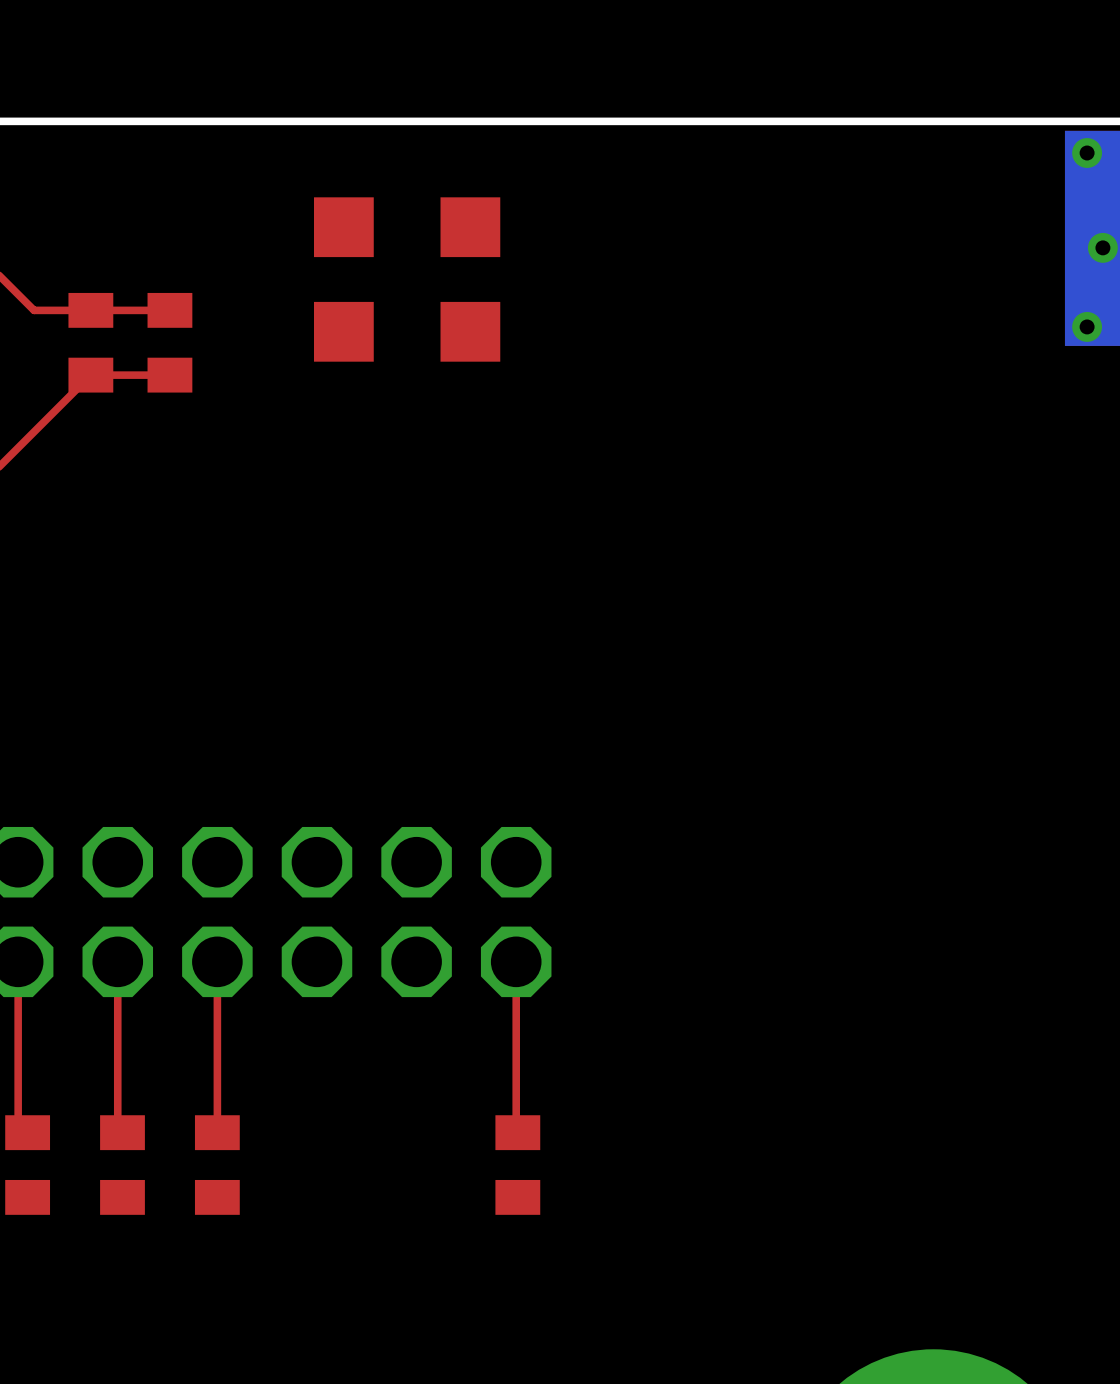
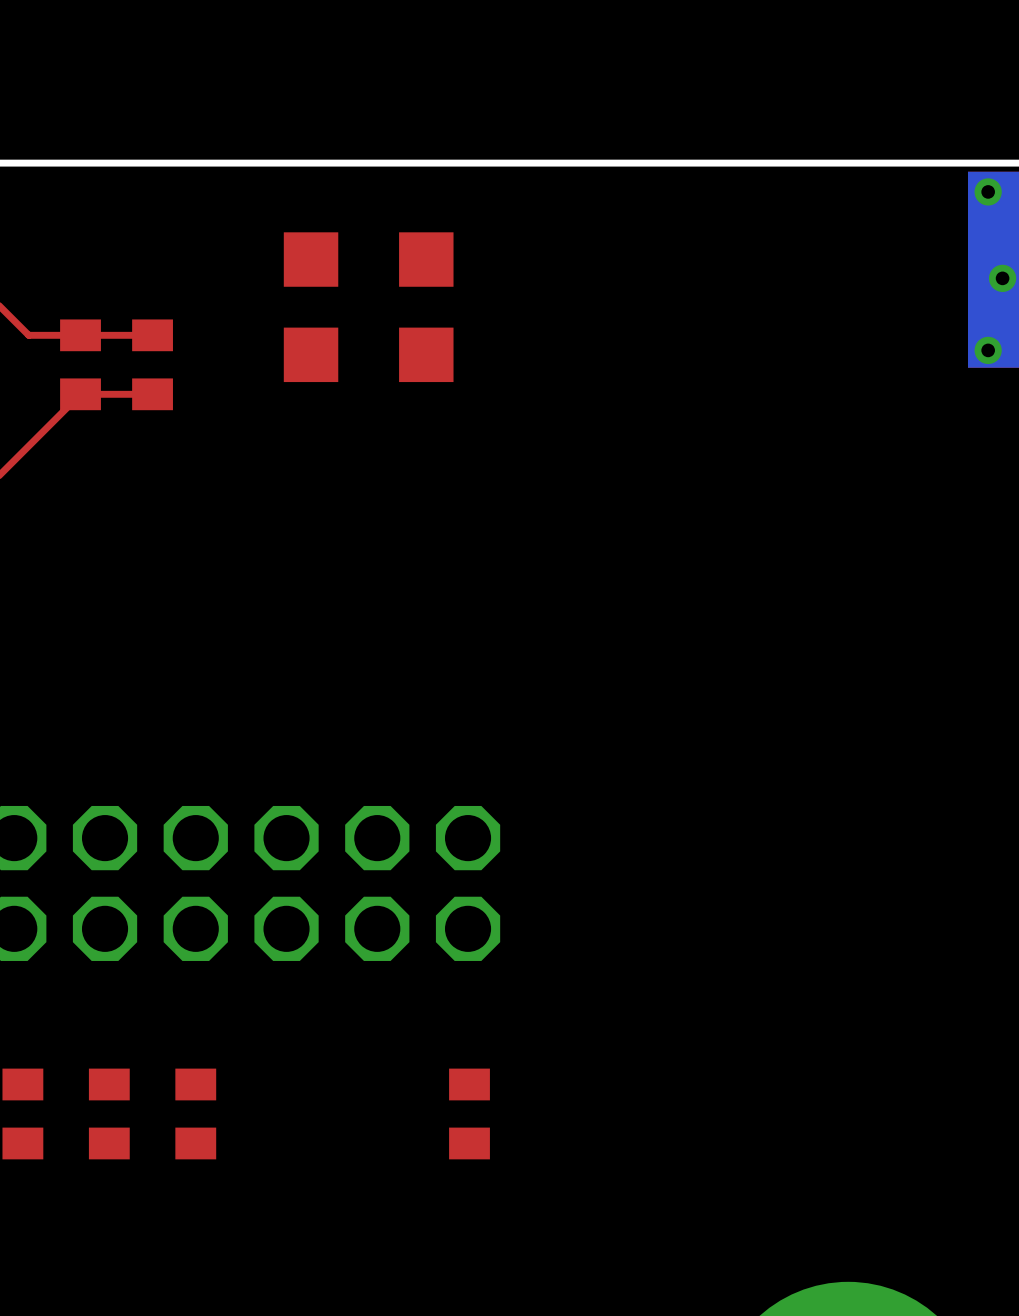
top track: (18, 961) (18, 1123) (27, 1132) -> none
top track: (117, 961) (117, 1127) (122, 1132) -> none
top track: (217, 961) (217, 1132) -> none
top track: (516, 961) (516, 1131) (517, 1132) -> none

